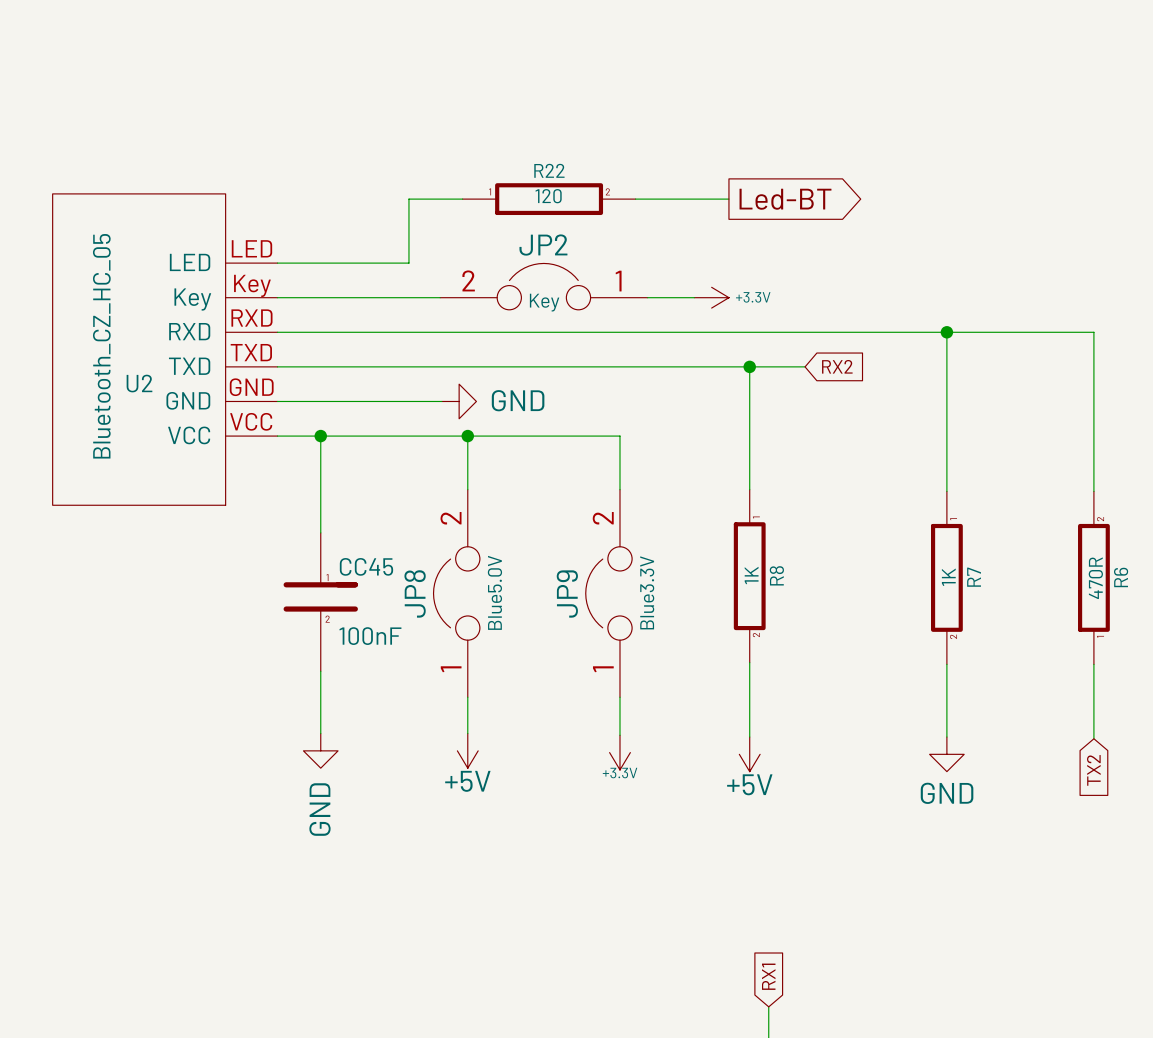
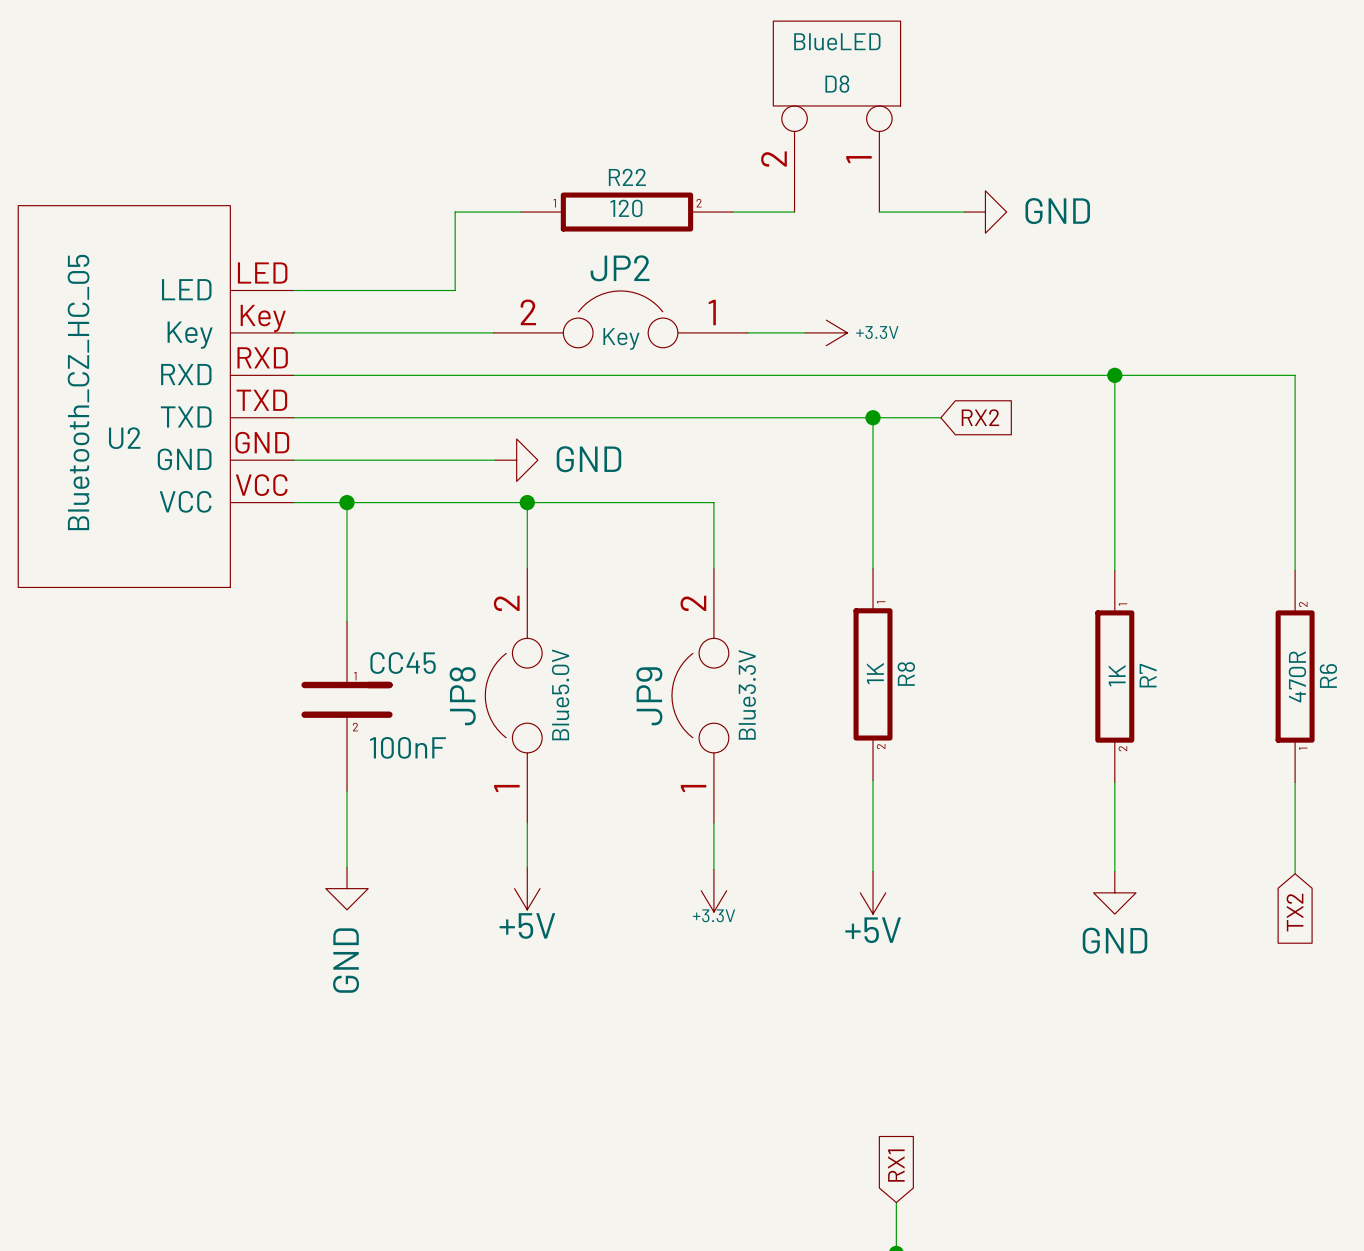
D8: none -> BlueLED (836, 116)
wire: (685, 199) (728, 199) -> none
wire: none -> (879, 212) (964, 212)
global label: Led-BT (785, 199) -> none
power symbol: none -> GND (985, 212)

